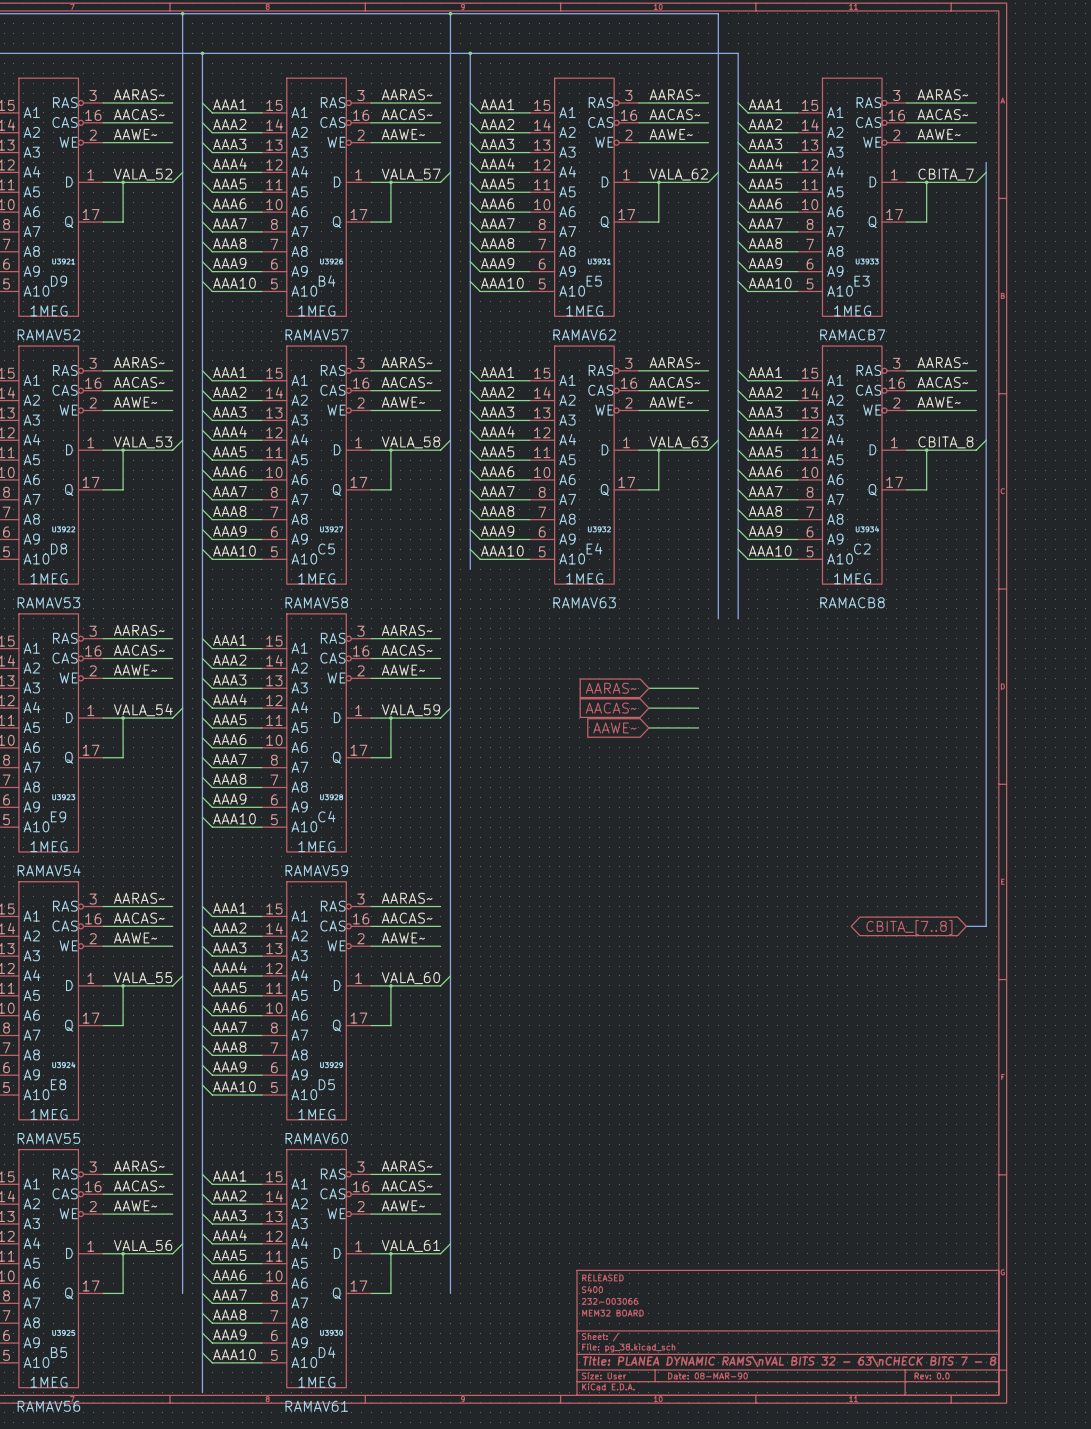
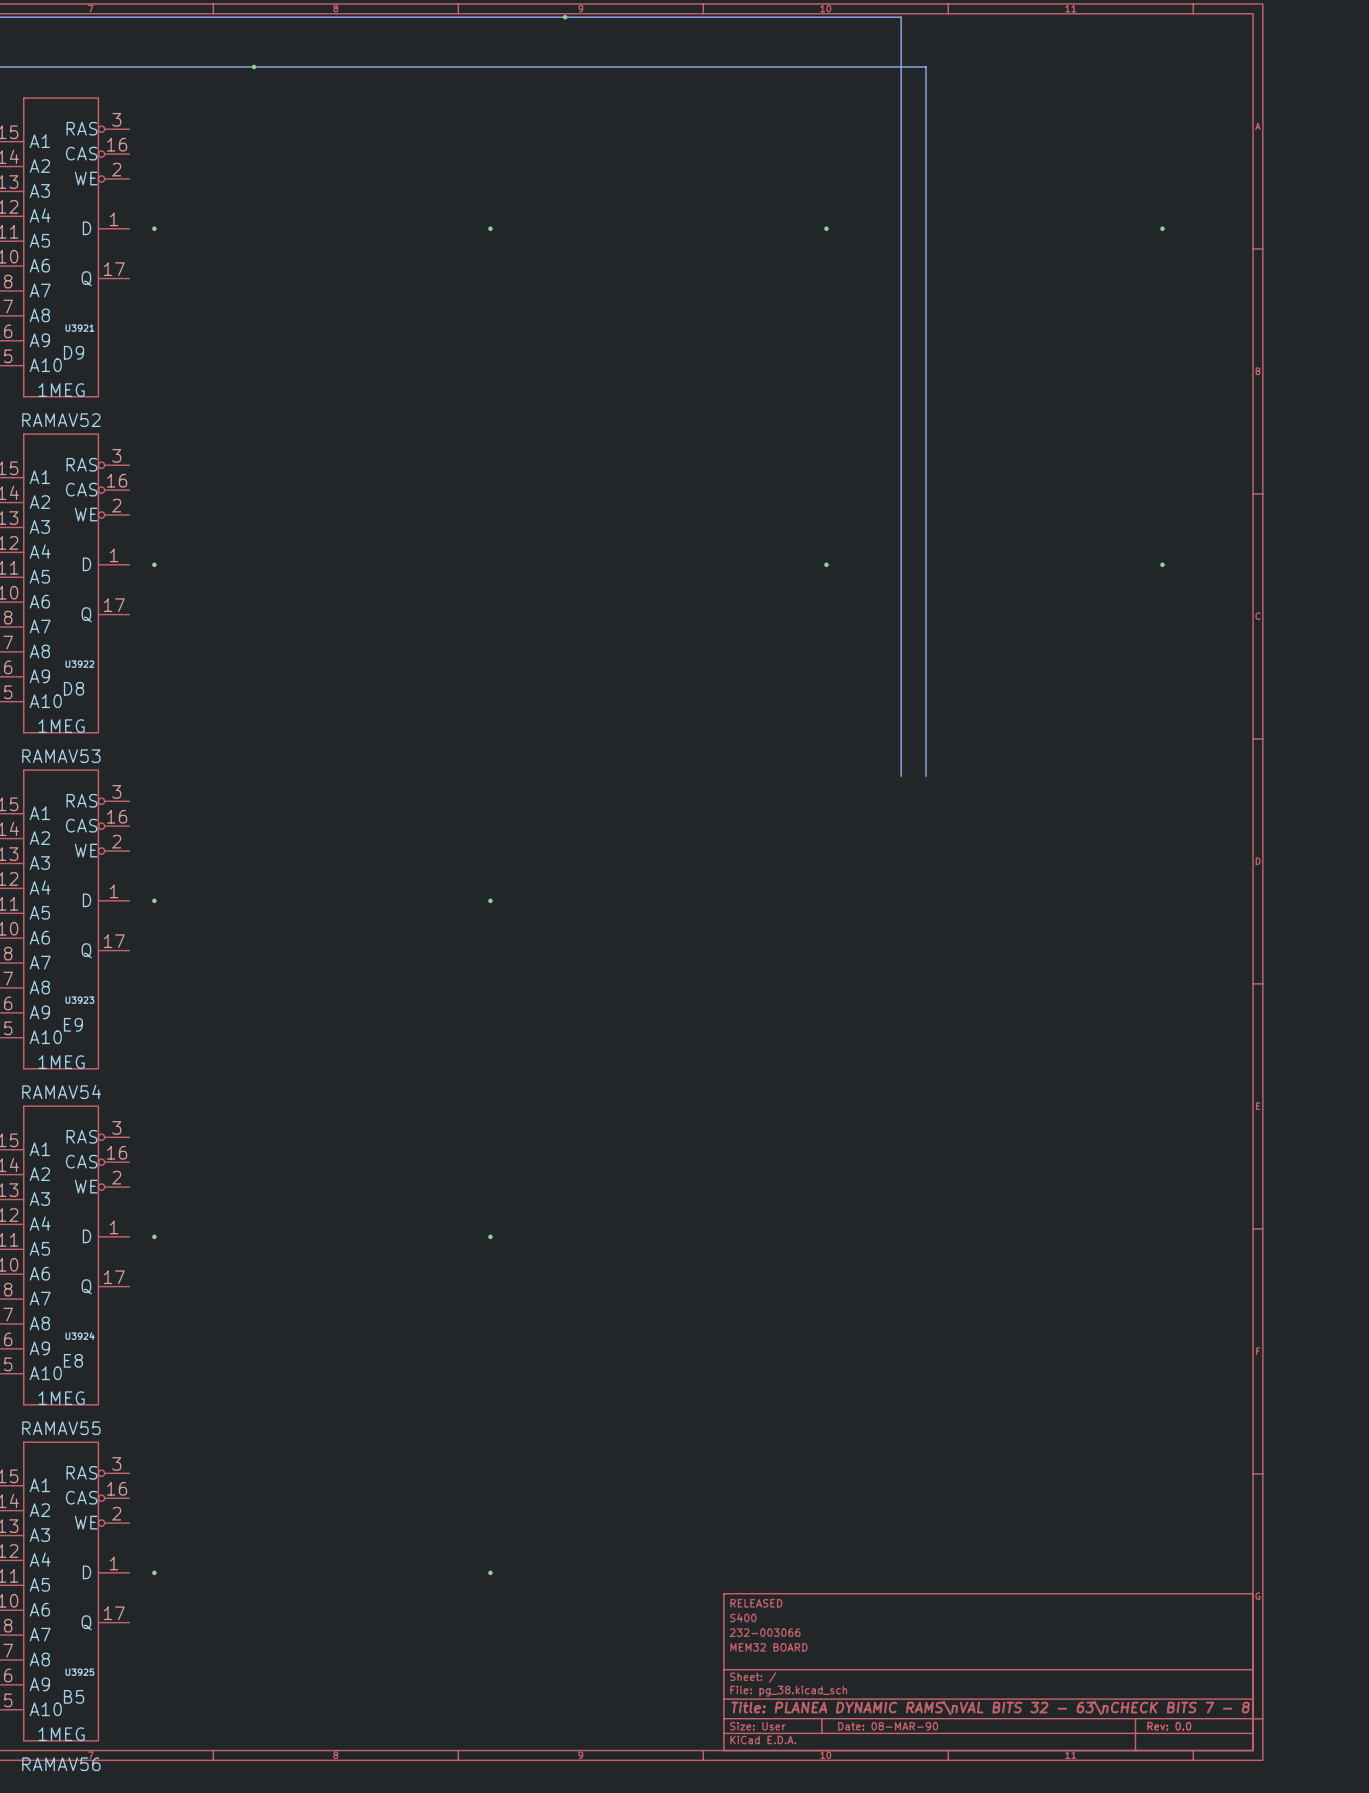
bus: (182, 13) (182, 1293) -> none
junction: (182, 13) -> none
bus: (450, 13) (450, 1293) -> none
bus: (202, 53) (202, 1392) -> none
bus: (470, 53) (470, 569) -> none
junction: (470, 53) -> none
label: AARAS~ (139, 94) -> none
label: AARAS~ (407, 94) -> none
label: AARAS~ (675, 94) -> none
label: AARAS~ (942, 94) -> none
wire: (103, 102) (172, 102) -> none
wire: (202, 102) (212, 112) (261, 112) -> none
wire: (371, 102) (440, 102) -> none
wire: (470, 102) (480, 112) (529, 112) -> none
wire: (638, 102) (708, 102) -> none
wire: (738, 102) (748, 112) (797, 112) -> none
wire: (906, 102) (976, 102) -> none
label: AAA1 (229, 104) -> none
label: AAA1 (497, 104) -> none
label: AAA1 (765, 104) -> none
label: AACAS~ (139, 114) -> none
label: AACAS~ (407, 114) -> none
label: AACAS~ (675, 114) -> none
label: AACAS~ (942, 114) -> none
wire: (103, 122) (172, 122) -> none
wire: (202, 122) (212, 132) (261, 132) -> none
wire: (371, 122) (440, 122) -> none
wire: (470, 122) (480, 132) (529, 132) -> none
wire: (638, 122) (708, 122) -> none
wire: (738, 122) (748, 132) (797, 132) -> none
wire: (906, 122) (976, 122) -> none
label: AAA2 (229, 124) -> none
label: AAA2 (497, 124) -> none
label: AAA2 (765, 124) -> none
label: AAWE~ (135, 134) -> none
label: AAWE~ (403, 134) -> none
label: AAWE~ (671, 134) -> none
label: AAWE~ (939, 134) -> none
wire: (103, 142) (172, 142) -> none
wire: (202, 142) (212, 152) (261, 152) -> none
wire: (371, 142) (440, 142) -> none
wire: (470, 142) (480, 152) (529, 152) -> none
wire: (638, 142) (708, 142) -> none
wire: (738, 142) (748, 152) (797, 152) -> none
wire: (906, 142) (976, 142) -> none
label: AAA3 (229, 144) -> none
label: AAA3 (497, 144) -> none
label: AAA3 (765, 144) -> none
wire: (202, 162) (212, 172) (261, 172) -> none
wire: (470, 162) (480, 172) (529, 172) -> none
wire: (738, 162) (748, 172) (797, 172) -> none
bus: (986, 162) (986, 926) (966, 926) -> none
label: AAA4 (230, 163) -> none
label: AAA4 (497, 163) -> none
label: AAA4 (765, 163) -> none
wire: (182, 172) (172, 182) (103, 182) -> none
wire: (450, 172) (440, 182) (371, 182) -> none
wire: (718, 172) (708, 182) (638, 182) -> none
wire: (986, 172) (976, 182) (906, 182) -> none
label: VALA_52 (143, 174) -> none
label: VALA_57 (411, 174) -> none
label: VALA_62 (678, 174) -> none
label: CBITA_7 (946, 174) -> none
wire: (123, 182) (123, 222) (103, 222) -> none
wire: (202, 182) (212, 192) (261, 192) -> none
wire: (390, 182) (390, 222) (371, 222) -> none
wire: (470, 182) (480, 192) (529, 192) -> none
wire: (658, 182) (658, 222) (638, 222) -> none
wire: (738, 182) (748, 192) (797, 192) -> none
wire: (926, 182) (926, 222) (906, 222) -> none
label: AAA5 (229, 184) -> none
label: AAA5 (497, 184) -> none
label: AAA5 (765, 184) -> none
part: 1MEG (316, 197) -> none
part: 1MEG (584, 197) -> none
part: 1MEG (852, 197) -> none
wire: (202, 202) (212, 212) (261, 212) -> none
wire: (470, 202) (480, 212) (529, 212) -> none
wire: (738, 202) (748, 212) (797, 212) -> none
label: AAA6 (229, 203) -> none
label: AAA6 (497, 203) -> none
label: AAA6 (765, 203) -> none
wire: (202, 222) (212, 231) (261, 231) -> none
wire: (470, 222) (480, 231) (529, 231) -> none
wire: (738, 222) (748, 231) (797, 231) -> none
label: AAA7 (230, 223) -> none
label: AAA7 (497, 223) -> none
label: AAA7 (765, 223) -> none
wire: (202, 241) (212, 251) (261, 251) -> none
wire: (470, 241) (480, 251) (529, 251) -> none
wire: (738, 241) (748, 251) (797, 251) -> none
label: AAA8 (229, 243) -> none
label: AAA8 (497, 243) -> none
label: AAA8 (765, 243) -> none
wire: (202, 261) (212, 271) (261, 271) -> none
wire: (470, 261) (480, 271) (529, 271) -> none
wire: (738, 261) (748, 271) (797, 271) -> none
label: AAA9 (229, 263) -> none
label: AAA9 (497, 263) -> none
label: AAA9 (765, 263) -> none
wire: (202, 281) (212, 291) (261, 291) -> none
wire: (470, 281) (480, 291) (529, 291) -> none
wire: (738, 281) (748, 291) (797, 291) -> none
label: AAA10 (234, 283) -> none
label: AAA10 (502, 283) -> none
label: AAA10 (770, 283) -> none
label: AARAS~ (139, 362) -> none
label: AARAS~ (407, 362) -> none
label: AARAS~ (675, 362) -> none
label: AARAS~ (942, 362) -> none
wire: (103, 370) (172, 370) -> none
wire: (202, 370) (212, 380) (261, 380) -> none
wire: (371, 370) (440, 370) -> none
wire: (470, 370) (480, 380) (529, 380) -> none
wire: (638, 370) (708, 370) -> none
wire: (738, 370) (748, 380) (797, 380) -> none
wire: (906, 370) (976, 370) -> none
label: AAA1 (229, 372) -> none
label: AAA1 (497, 372) -> none
label: AAA1 (765, 372) -> none
label: AACAS~ (139, 382) -> none
label: AACAS~ (407, 382) -> none
label: AACAS~ (675, 382) -> none
label: AACAS~ (942, 382) -> none
wire: (103, 390) (172, 390) -> none
wire: (202, 390) (212, 400) (261, 400) -> none
wire: (371, 390) (440, 390) -> none
wire: (470, 390) (480, 400) (529, 400) -> none
wire: (638, 390) (708, 390) -> none
wire: (738, 390) (748, 400) (797, 400) -> none
wire: (906, 390) (976, 390) -> none
label: AAA2 (229, 392) -> none
label: AAA2 (497, 392) -> none
label: AAA2 (765, 392) -> none
label: AAWE~ (135, 402) -> none
label: AAWE~ (403, 402) -> none
label: AAWE~ (671, 402) -> none
label: AAWE~ (939, 402) -> none
wire: (103, 410) (172, 410) -> none
wire: (202, 410) (212, 420) (261, 420) -> none
wire: (371, 410) (440, 410) -> none
wire: (470, 410) (480, 420) (529, 420) -> none
wire: (638, 410) (708, 410) -> none
wire: (738, 410) (748, 420) (797, 420) -> none
wire: (906, 410) (976, 410) -> none
label: AAA3 (229, 412) -> none
label: AAA3 (497, 412) -> none
label: AAA3 (765, 412) -> none
wire: (202, 430) (212, 440) (261, 440) -> none
wire: (470, 430) (480, 440) (529, 440) -> none
wire: (738, 430) (748, 440) (797, 440) -> none
label: AAA4 (230, 431) -> none
label: AAA4 (497, 431) -> none
label: AAA4 (765, 431) -> none
wire: (182, 440) (172, 450) (103, 450) -> none
wire: (450, 440) (440, 450) (371, 450) -> none
wire: (718, 440) (708, 450) (638, 450) -> none
wire: (986, 440) (976, 450) (906, 450) -> none
label: VALA_53 (143, 442) -> none
label: VALA_58 (410, 442) -> none
label: VALA_63 (678, 442) -> none
label: CBITA_8 (945, 442) -> none
wire: (123, 450) (123, 489) (103, 489) -> none
wire: (202, 450) (212, 460) (261, 460) -> none
wire: (390, 450) (390, 489) (371, 489) -> none
junction: (390, 450) -> none
wire: (470, 450) (480, 460) (529, 460) -> none
wire: (658, 450) (658, 489) (638, 489) -> none
wire: (738, 450) (748, 460) (797, 460) -> none
wire: (926, 450) (926, 489) (906, 489) -> none
label: AAA5 (229, 451) -> none
label: AAA5 (497, 451) -> none
label: AAA5 (765, 451) -> none
part: 1MEG (316, 465) -> none
part: 1MEG (584, 465) -> none
part: 1MEG (852, 465) -> none
wire: (202, 470) (212, 479) (261, 479) -> none
wire: (470, 470) (480, 479) (529, 479) -> none
wire: (738, 470) (748, 479) (797, 479) -> none
label: AAA6 (229, 471) -> none
label: AAA6 (497, 471) -> none
label: AAA6 (765, 471) -> none
wire: (202, 489) (212, 499) (261, 499) -> none
wire: (470, 489) (480, 499) (529, 499) -> none
wire: (738, 489) (748, 499) (797, 499) -> none
label: AAA7 (230, 491) -> none
label: AAA7 (497, 491) -> none
label: AAA7 (765, 491) -> none
wire: (202, 509) (212, 519) (261, 519) -> none
wire: (470, 509) (480, 519) (529, 519) -> none
wire: (738, 509) (748, 519) (797, 519) -> none
label: AAA8 (229, 511) -> none
label: AAA8 (497, 511) -> none
label: AAA8 (765, 511) -> none
wire: (202, 529) (212, 539) (261, 539) -> none
wire: (470, 529) (480, 539) (529, 539) -> none
wire: (738, 529) (748, 539) (797, 539) -> none
label: AAA9 (229, 531) -> none
label: AAA9 (497, 531) -> none
label: AAA9 (765, 531) -> none
wire: (202, 549) (212, 559) (261, 559) -> none
wire: (470, 549) (480, 559) (529, 559) -> none
wire: (738, 549) (748, 559) (797, 559) -> none
label: AAA10 (234, 551) -> none
label: AAA10 (502, 551) -> none
label: AAA10 (770, 551) -> none
label: AARAS~ (139, 630) -> none
label: AARAS~ (407, 630) -> none
wire: (103, 638) (172, 638) -> none
wire: (202, 638) (212, 648) (261, 648) -> none
wire: (371, 638) (440, 638) -> none
label: AAA1 (229, 640) -> none
label: AACAS~ (139, 650) -> none
label: AACAS~ (407, 650) -> none
wire: (103, 658) (172, 658) -> none
wire: (202, 658) (212, 668) (261, 668) -> none
wire: (371, 658) (440, 658) -> none
label: AAA2 (229, 660) -> none
label: AAWE~ (135, 670) -> none
label: AAWE~ (403, 670) -> none
wire: (103, 678) (172, 678) -> none
wire: (202, 678) (212, 688) (261, 688) -> none
wire: (371, 678) (440, 678) -> none
label: AAA3 (229, 680) -> none
global label: AARAS~ (611, 688) -> none
wire: (648, 688) (698, 688) -> none
wire: (202, 698) (212, 708) (261, 708) -> none
label: AAA4 (230, 699) -> none
wire: (182, 708) (172, 718) (103, 718) -> none
wire: (450, 708) (440, 718) (371, 718) -> none
global label: AACAS~ (611, 708) -> none
wire: (648, 708) (698, 708) -> none
label: VALA_54 (143, 710) -> none
label: VALA_59 (410, 710) -> none
wire: (123, 718) (123, 757) (103, 757) -> none
wire: (202, 718) (212, 727) (261, 727) -> none
wire: (390, 718) (390, 757) (371, 757) -> none
label: AAA5 (229, 719) -> none
global label: AAWE~ (614, 727) -> none
wire: (648, 727) (698, 727) -> none
part: 1MEG (316, 732) -> none
wire: (202, 737) (212, 747) (261, 747) -> none
label: AAA6 (229, 739) -> none
wire: (202, 757) (212, 767) (261, 767) -> none
label: AAA7 (230, 759) -> none
wire: (202, 777) (212, 787) (261, 787) -> none
label: AAA8 (229, 779) -> none
wire: (202, 797) (212, 807) (261, 807) -> none
label: AAA9 (229, 799) -> none
wire: (202, 817) (212, 827) (261, 827) -> none
label: AAA10 (234, 818) -> none
label: AARAS~ (139, 898) -> none
label: AARAS~ (407, 898) -> none
wire: (103, 906) (172, 906) -> none
wire: (202, 906) (212, 916) (261, 916) -> none
wire: (371, 906) (440, 906) -> none
label: AAA1 (229, 908) -> none
label: AACAS~ (139, 918) -> none
label: AACAS~ (407, 918) -> none
wire: (103, 926) (172, 926) -> none
wire: (202, 926) (212, 936) (261, 936) -> none
wire: (371, 926) (440, 926) -> none
global label: CBITA_[7..8] (909, 927) -> none
label: AAA2 (229, 928) -> none
label: AAWE~ (135, 937) -> none
label: AAWE~ (403, 937) -> none
wire: (103, 946) (172, 946) -> none
wire: (202, 946) (212, 956) (261, 956) -> none
wire: (371, 946) (440, 946) -> none
label: AAA3 (229, 947) -> none
wire: (202, 966) (212, 975) (261, 975) -> none
label: AAA4 (230, 967) -> none
wire: (182, 975) (172, 985) (103, 985) -> none
wire: (450, 975) (440, 985) (371, 985) -> none
label: VALA_55 (143, 978) -> none
label: VALA_60 (410, 978) -> none
wire: (123, 985) (123, 1025) (103, 1025) -> none
wire: (202, 985) (212, 995) (261, 995) -> none
wire: (390, 985) (390, 1025) (371, 1025) -> none
label: AAA5 (229, 987) -> none
part: 1MEG (316, 1000) -> none
wire: (202, 1005) (212, 1015) (261, 1015) -> none
label: AAA6 (229, 1007) -> none
wire: (202, 1025) (212, 1035) (261, 1035) -> none
label: AAA7 (230, 1027) -> none
wire: (202, 1045) (212, 1055) (261, 1055) -> none
label: AAA8 (229, 1047) -> none
wire: (202, 1065) (212, 1075) (261, 1075) -> none
label: AAA9 (229, 1066) -> none
wire: (202, 1085) (212, 1095) (261, 1095) -> none
label: AAA10 (234, 1086) -> none
label: AARAS~ (139, 1166) -> none
label: AARAS~ (407, 1166) -> none
wire: (103, 1174) (172, 1174) -> none
wire: (202, 1174) (212, 1184) (261, 1184) -> none
wire: (371, 1174) (440, 1174) -> none
label: AAA1 (229, 1176) -> none
label: AACAS~ (139, 1185) -> none
label: AACAS~ (407, 1185) -> none
wire: (103, 1194) (172, 1194) -> none
wire: (202, 1194) (212, 1204) (261, 1204) -> none
wire: (371, 1194) (440, 1194) -> none
label: AAA2 (229, 1195) -> none
label: AAWE~ (135, 1205) -> none
label: AAWE~ (403, 1205) -> none
wire: (103, 1214) (172, 1214) -> none
wire: (202, 1214) (212, 1223) (261, 1223) -> none
wire: (371, 1214) (440, 1214) -> none
label: AAA3 (229, 1215) -> none
wire: (202, 1233) (212, 1243) (261, 1243) -> none
label: AAA4 (230, 1235) -> none
wire: (182, 1243) (172, 1253) (103, 1253) -> none
wire: (450, 1243) (440, 1253) (371, 1253) -> none
label: VALA_56 (143, 1245) -> none
label: VALA_61 (410, 1245) -> none
wire: (123, 1253) (123, 1293) (103, 1293) -> none
wire: (202, 1253) (212, 1263) (261, 1263) -> none
wire: (390, 1253) (390, 1293) (371, 1293) -> none
label: AAA5 (229, 1255) -> none
part: 1MEG (316, 1268) -> none
wire: (202, 1273) (212, 1283) (261, 1283) -> none
label: AAA6 (229, 1275) -> none
wire: (202, 1293) (212, 1303) (261, 1303) -> none
label: AAA7 (230, 1295) -> none
wire: (202, 1313) (212, 1323) (261, 1323) -> none
label: AAA8 (229, 1314) -> none
wire: (202, 1333) (212, 1343) (261, 1343) -> none
label: AAA9 (229, 1334) -> none
wire: (202, 1352) (212, 1362) (261, 1362) -> none
label: AAA10 (234, 1354) -> none

